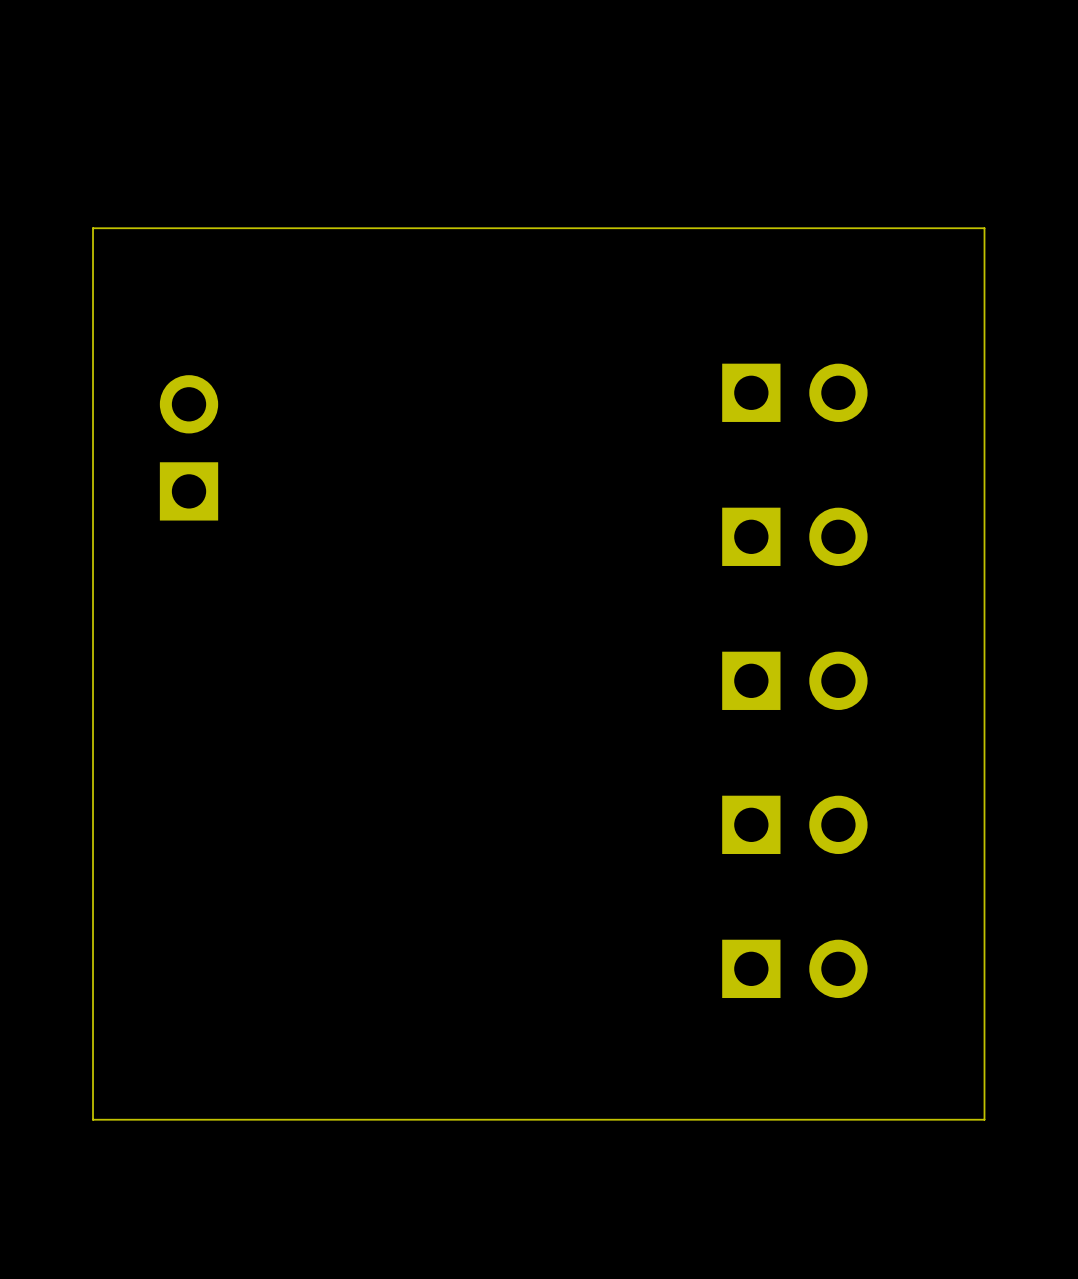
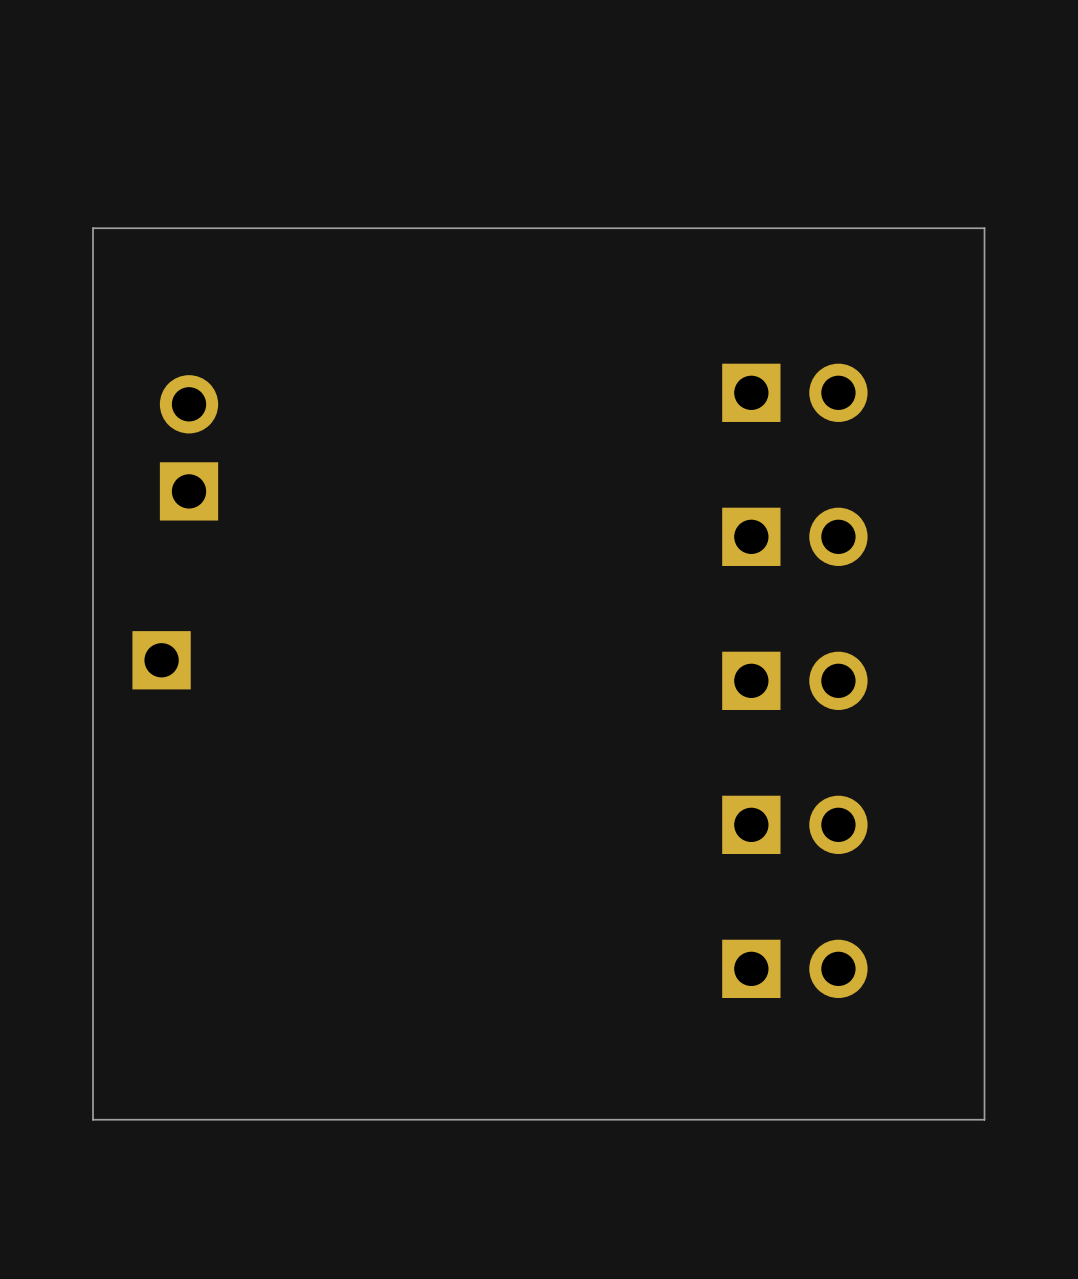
part: none -> (161, 660)

